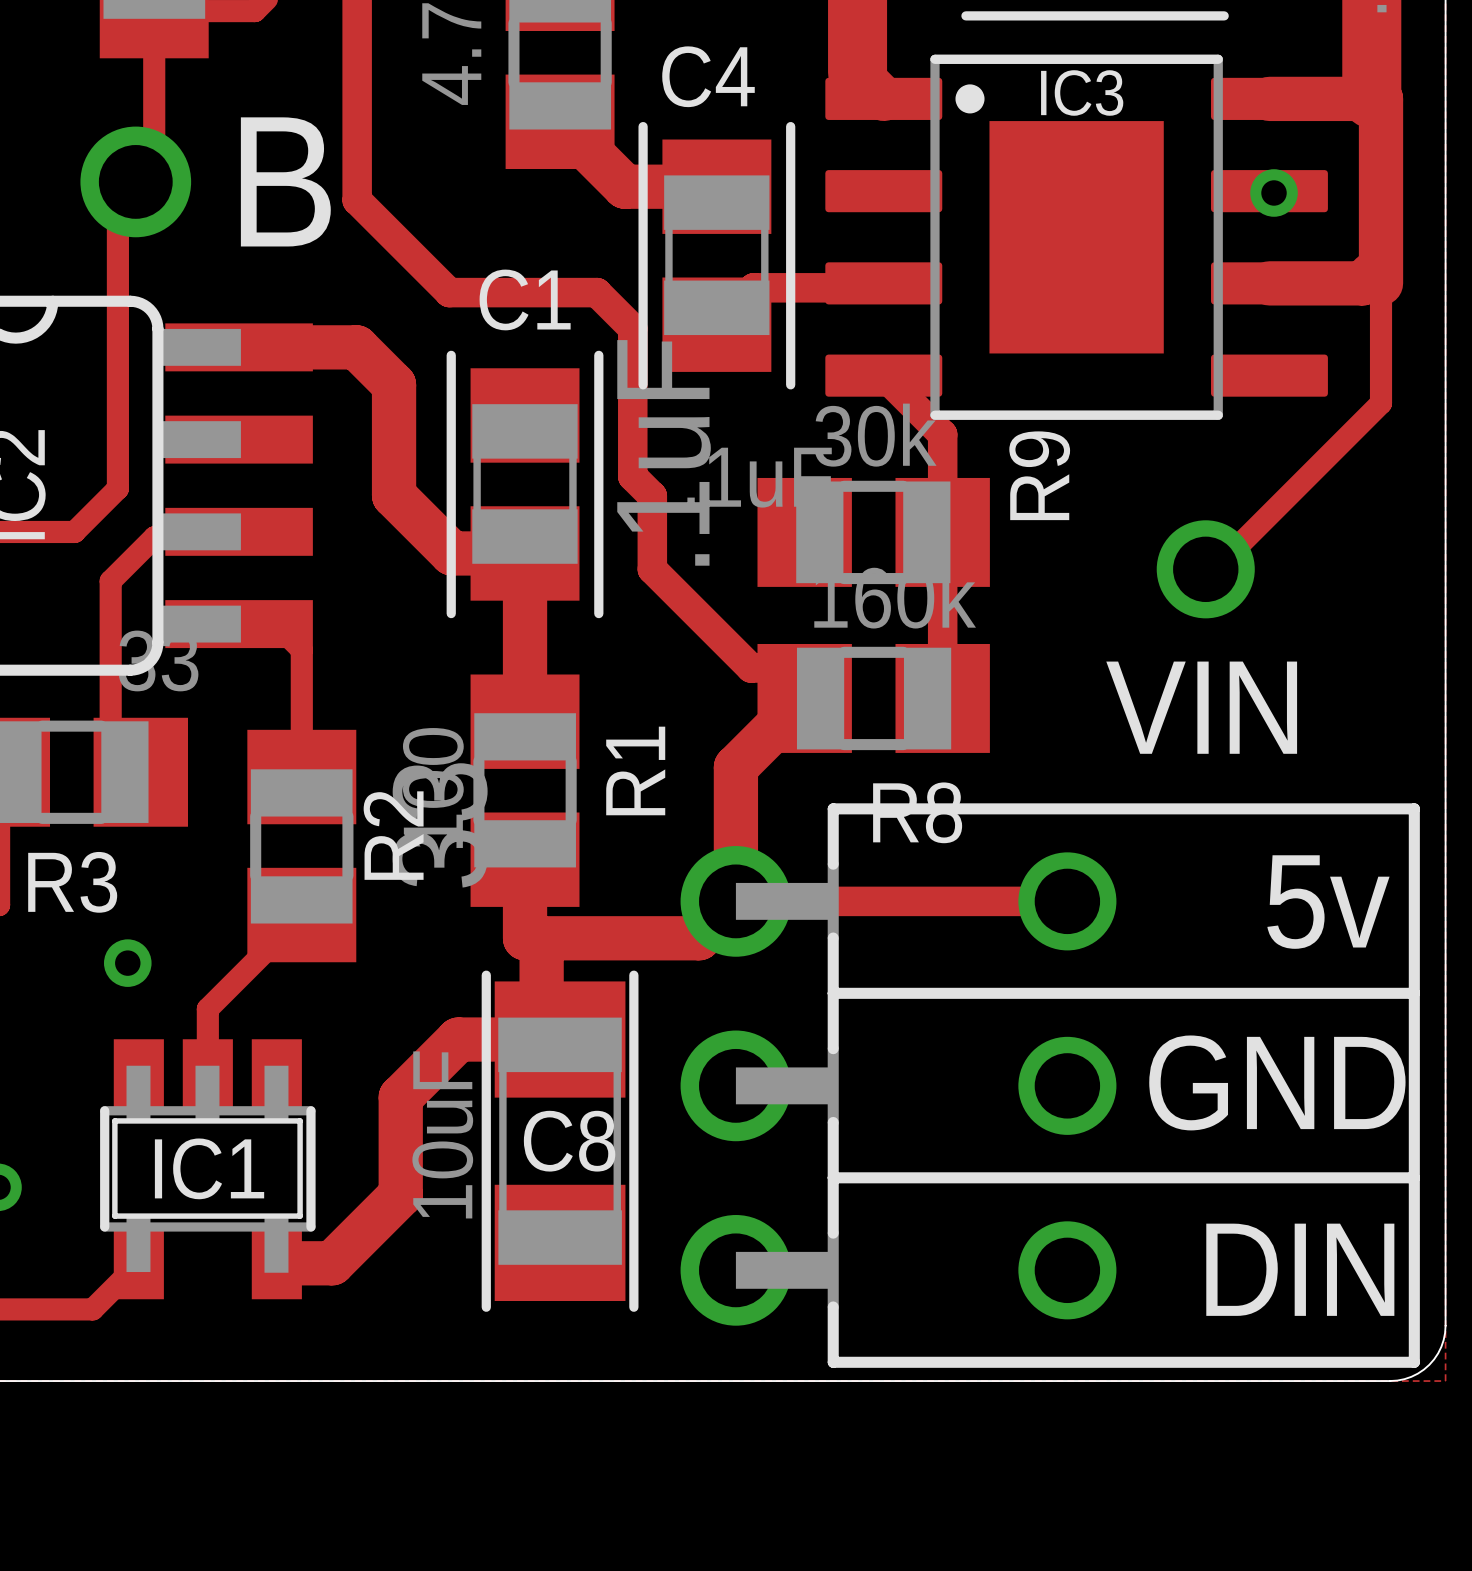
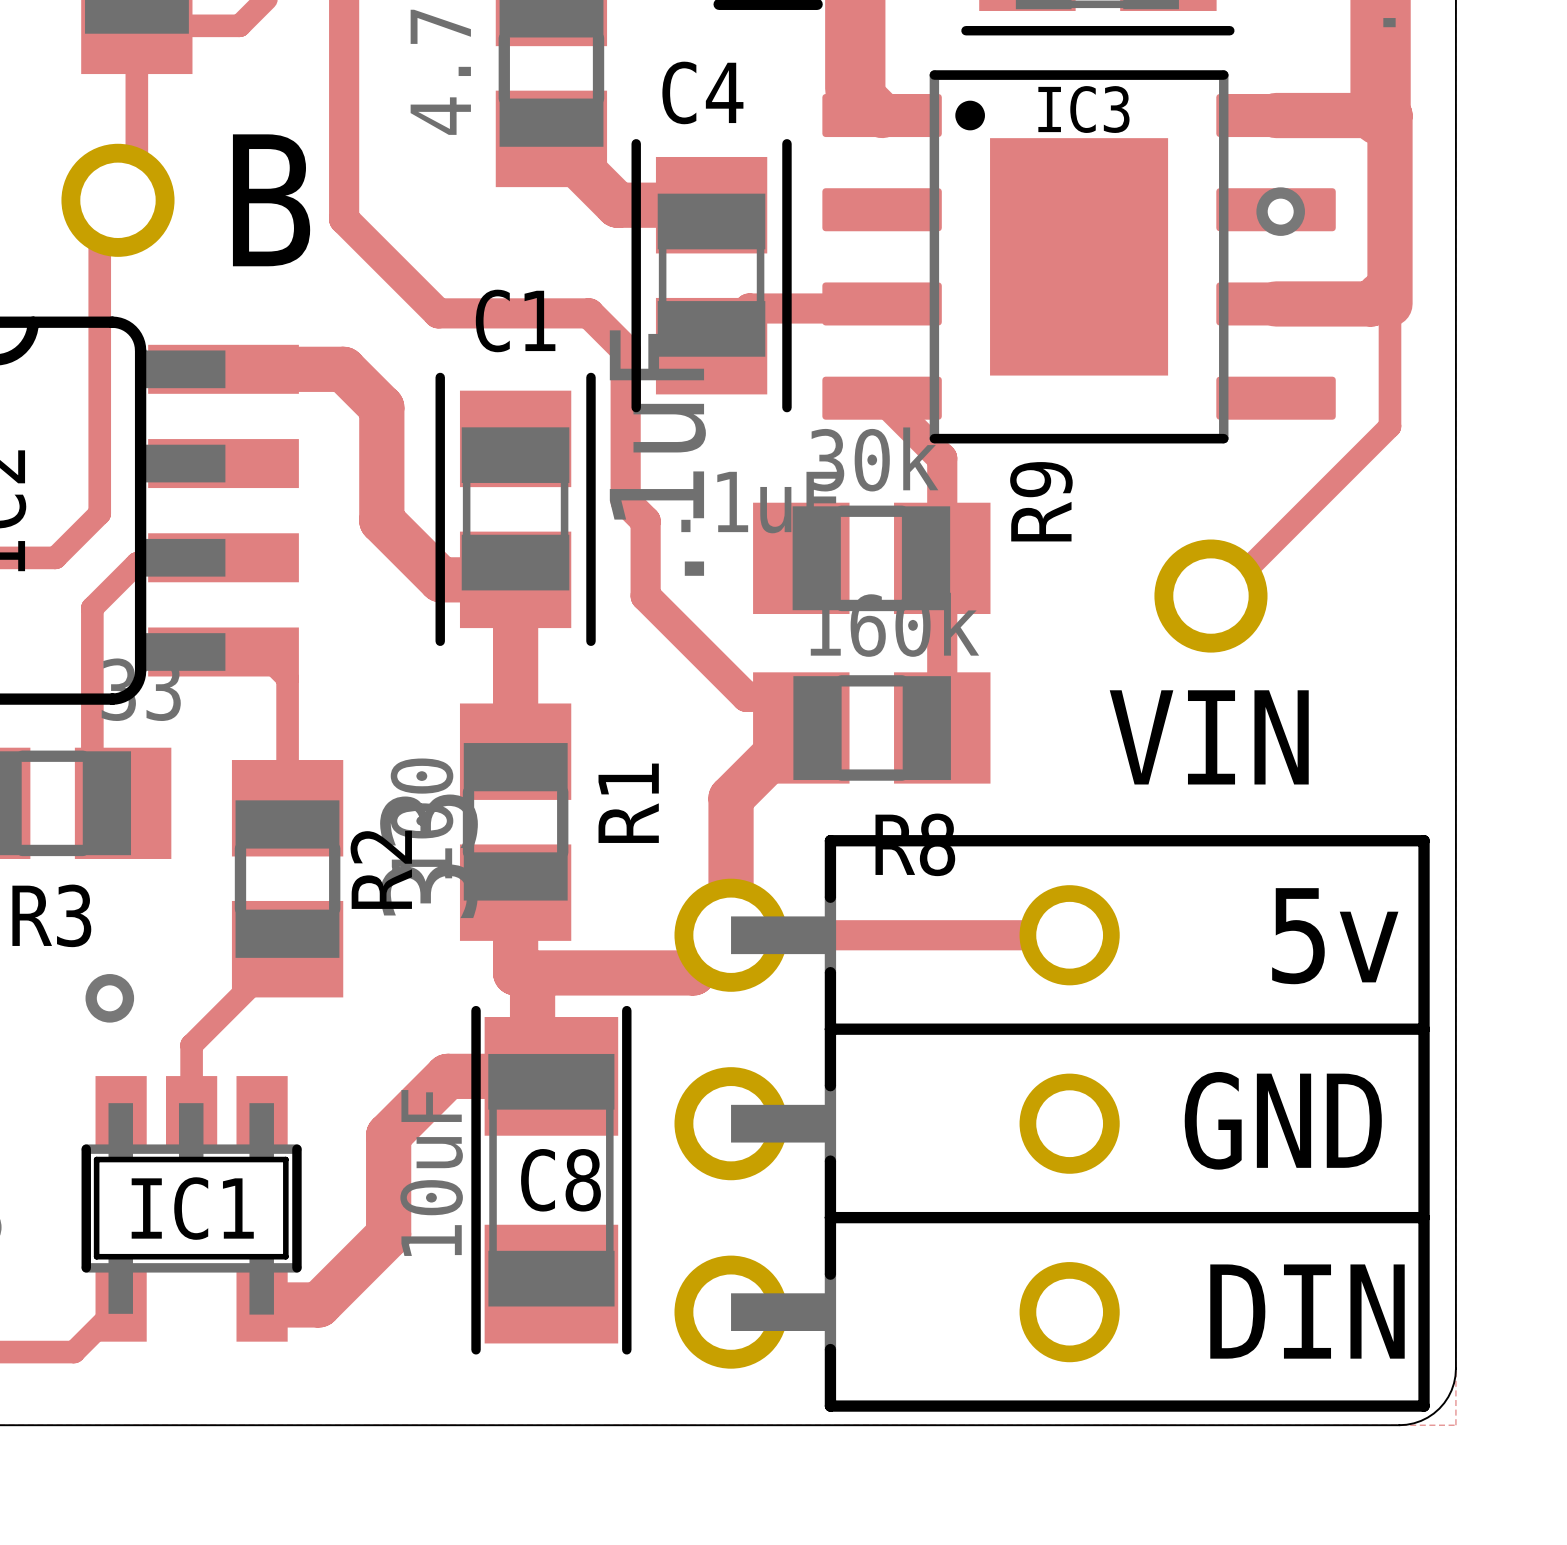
part footprint: [1156, 520, 1255, 619] -> [1154, 539, 1268, 653]

